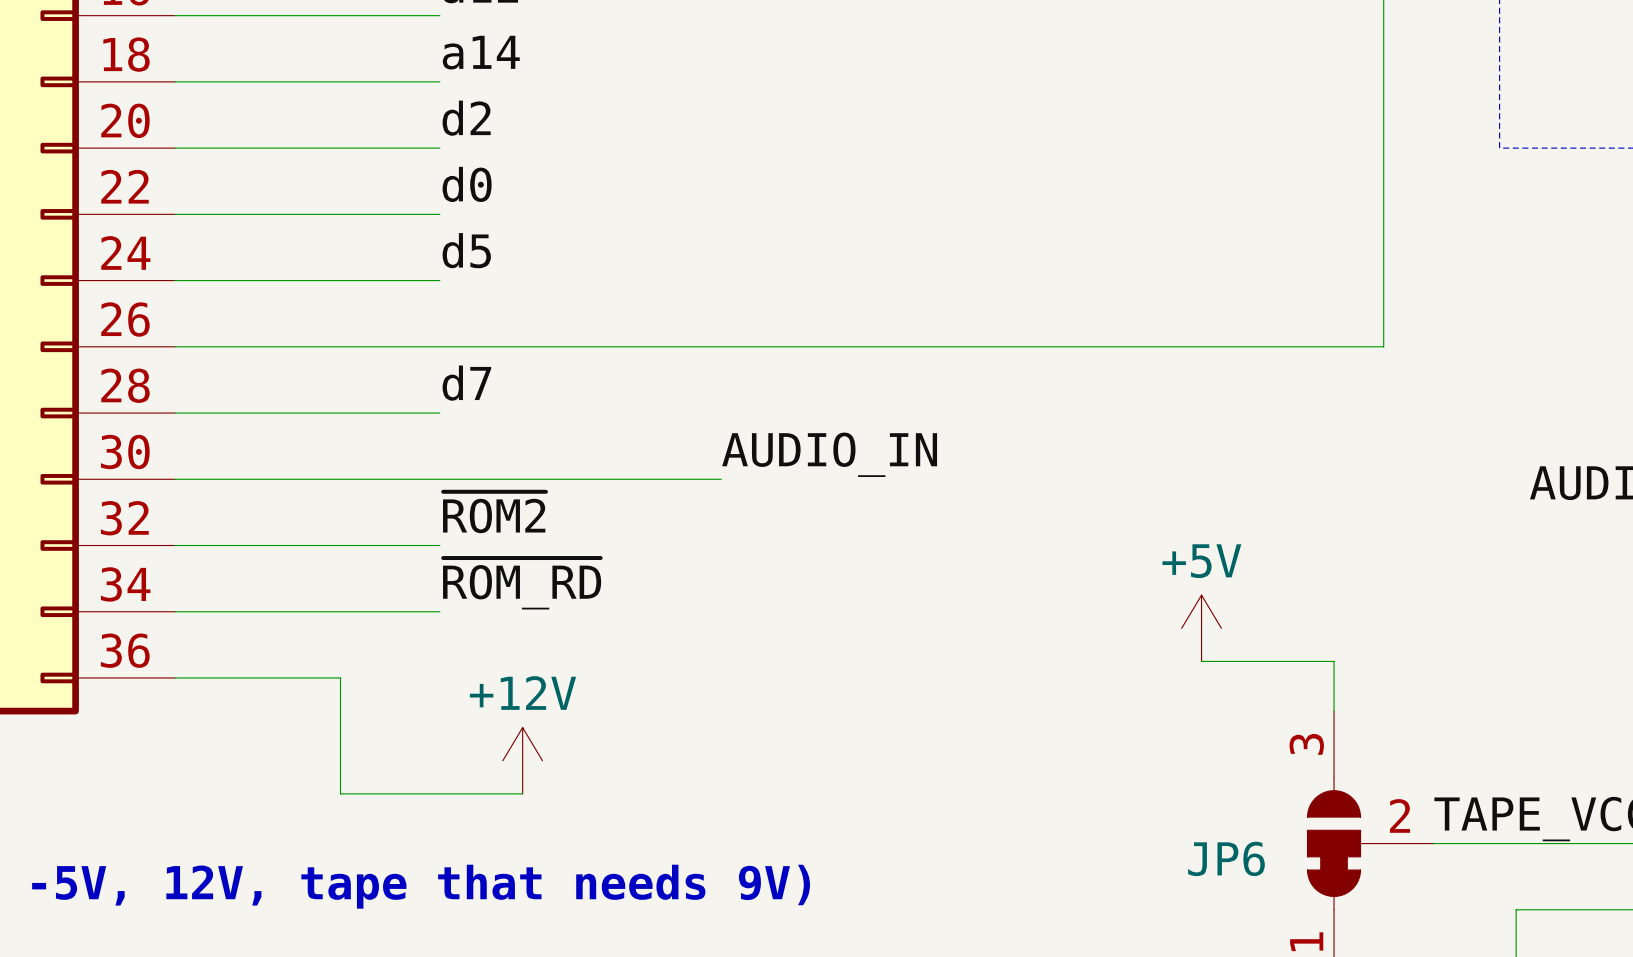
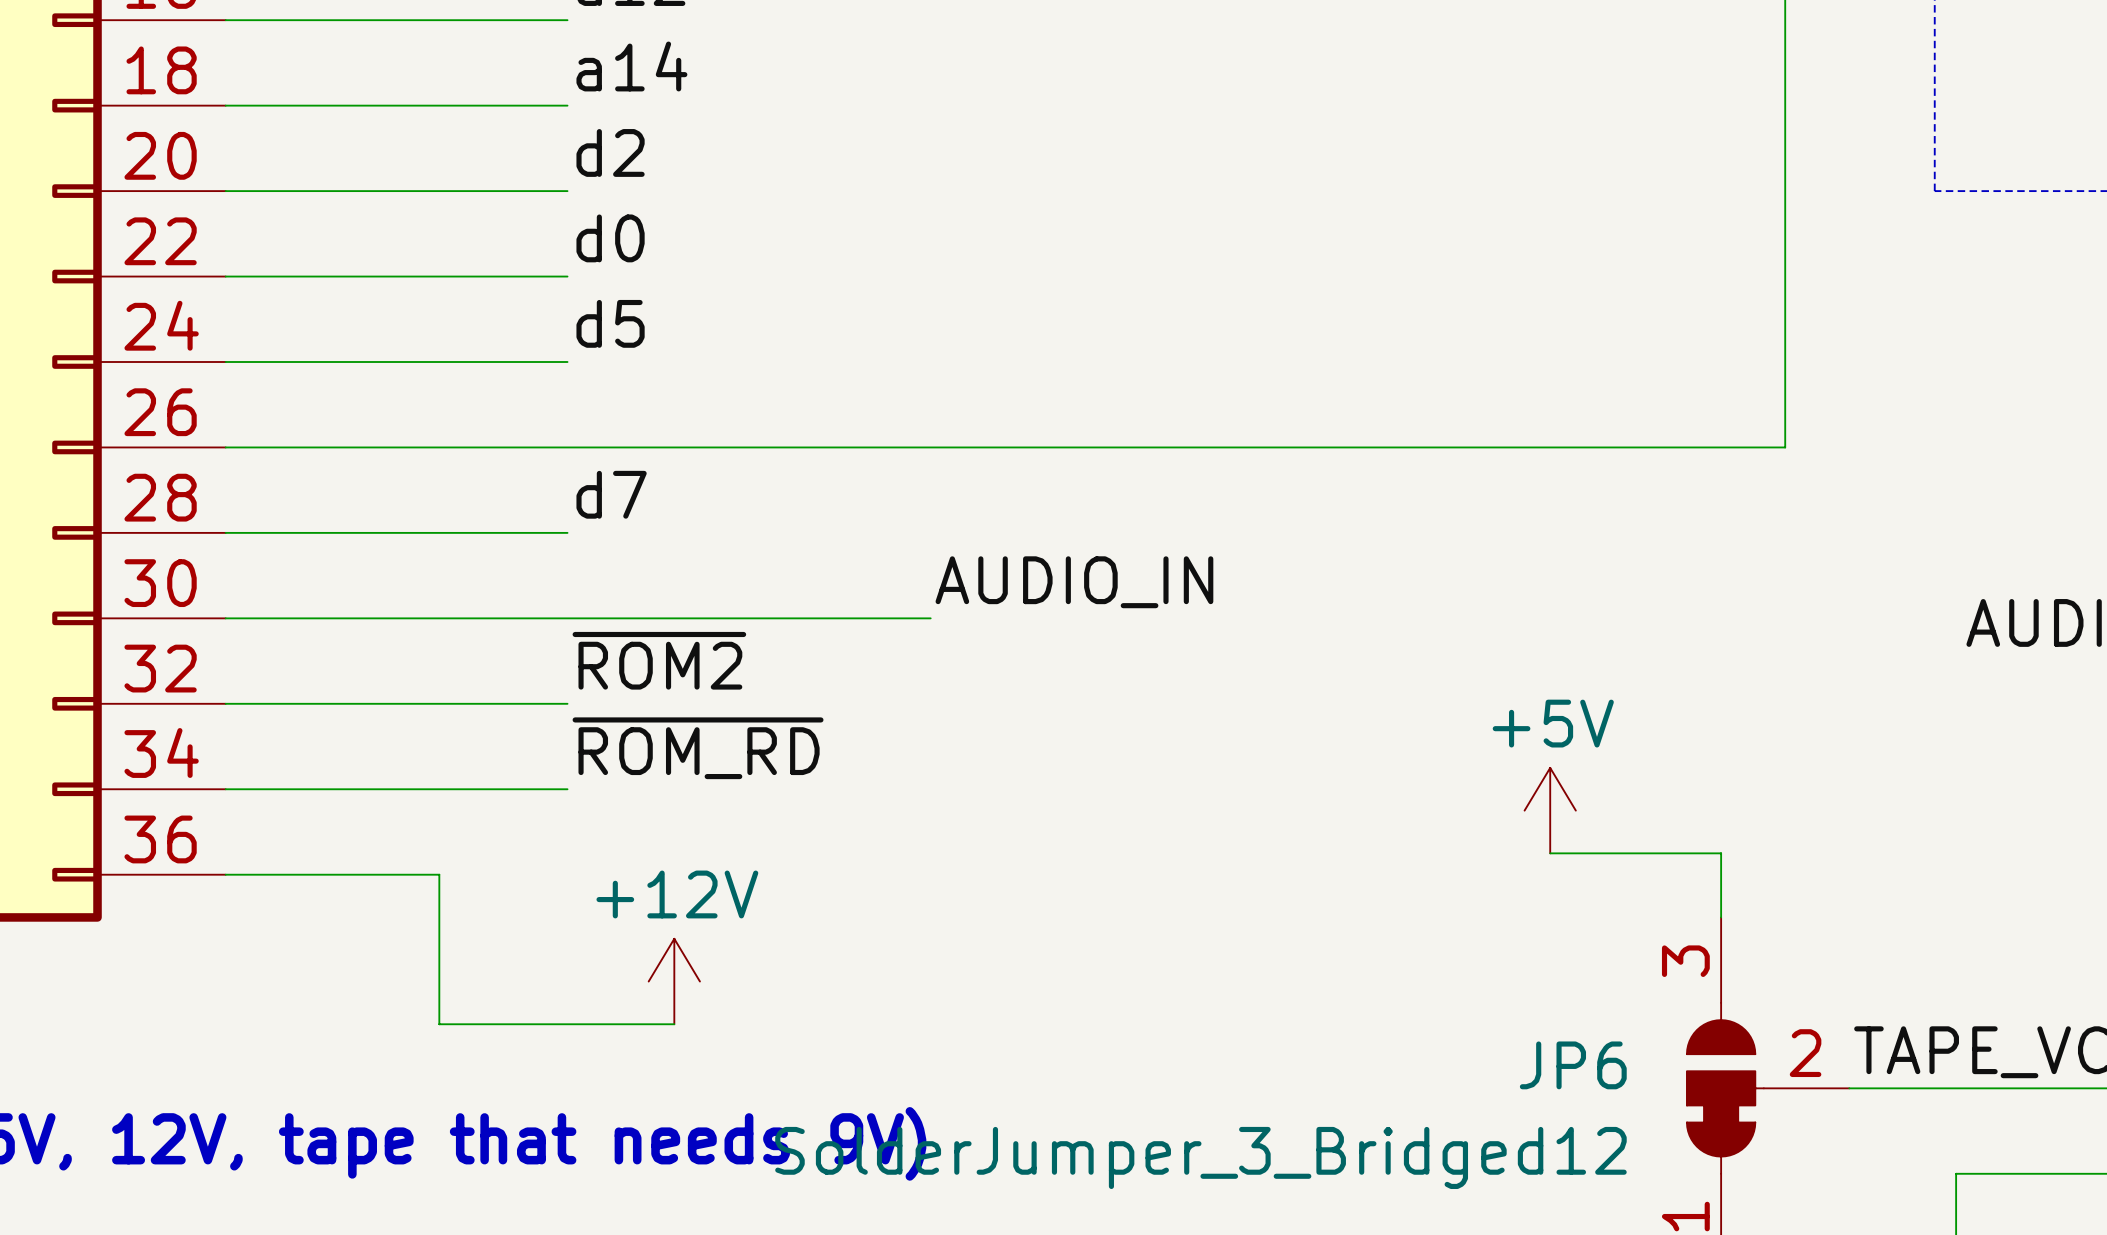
JP6 name position: JP6 (1226, 858) -> JP6 (1573, 1065)
JP6 value: none -> SolderJumper_3_Bridged12 (1200, 1157)

